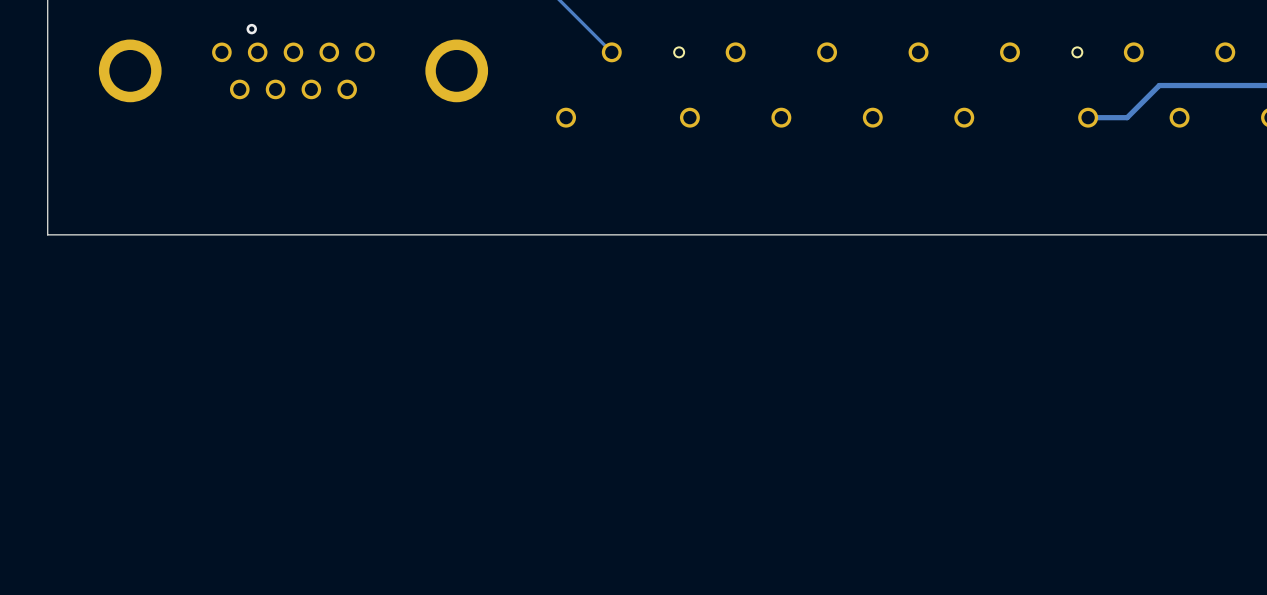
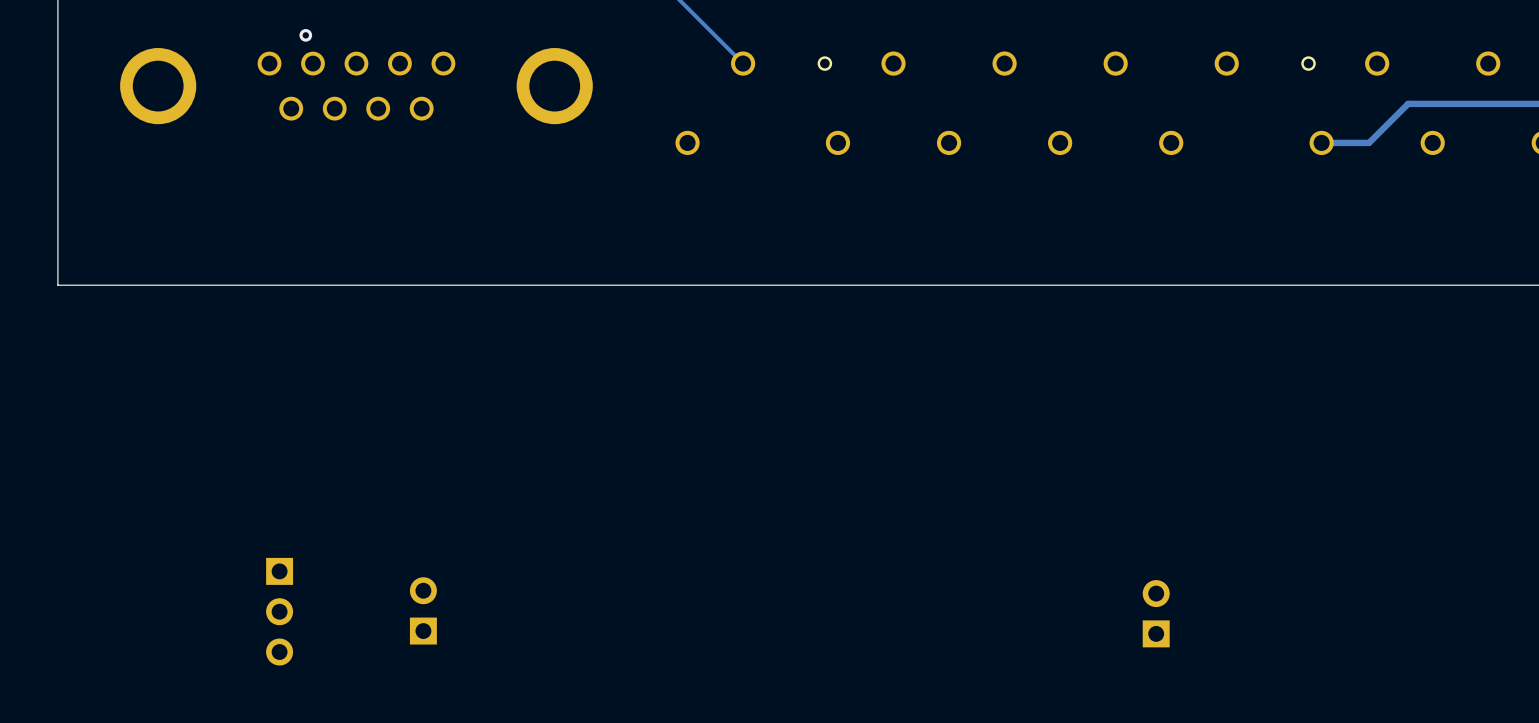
part: none -> (423, 610)
part: none -> (279, 611)
part: none -> (1156, 613)

